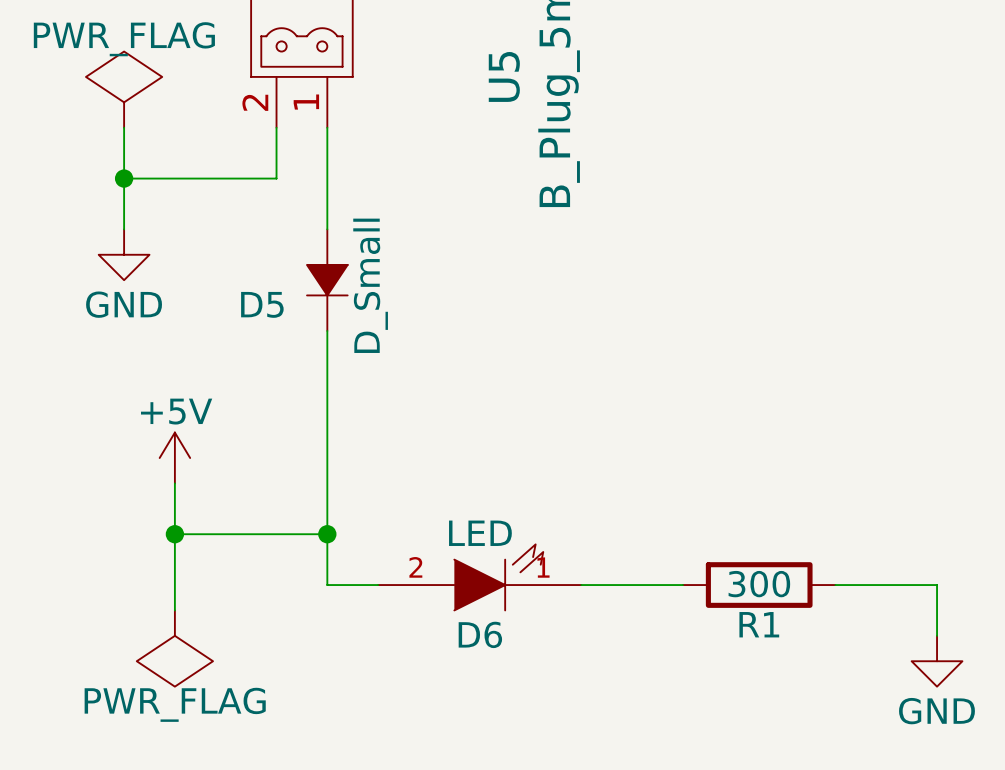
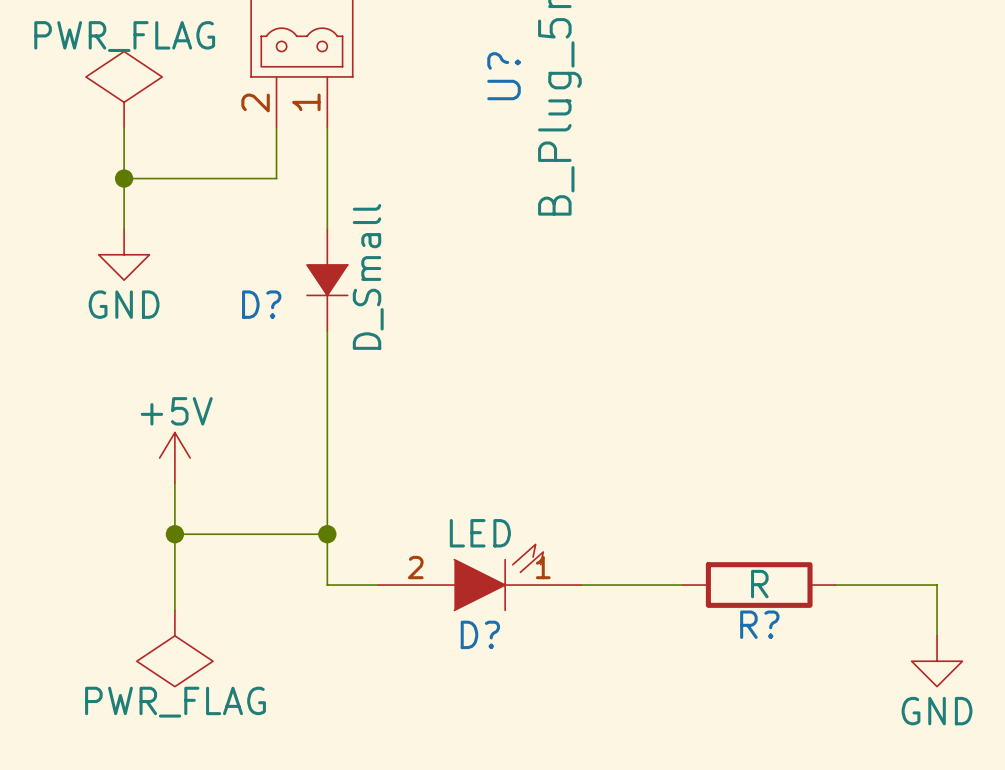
U5 name: U5 (504, 76) -> U? (504, 76)
D5 name: D5 (262, 304) -> D? (261, 304)
R1 value: 300 (759, 584) -> R (759, 584)
R1 name: R1 (759, 624) -> R? (759, 624)
D6 name: D6 (480, 634) -> D? (480, 634)

